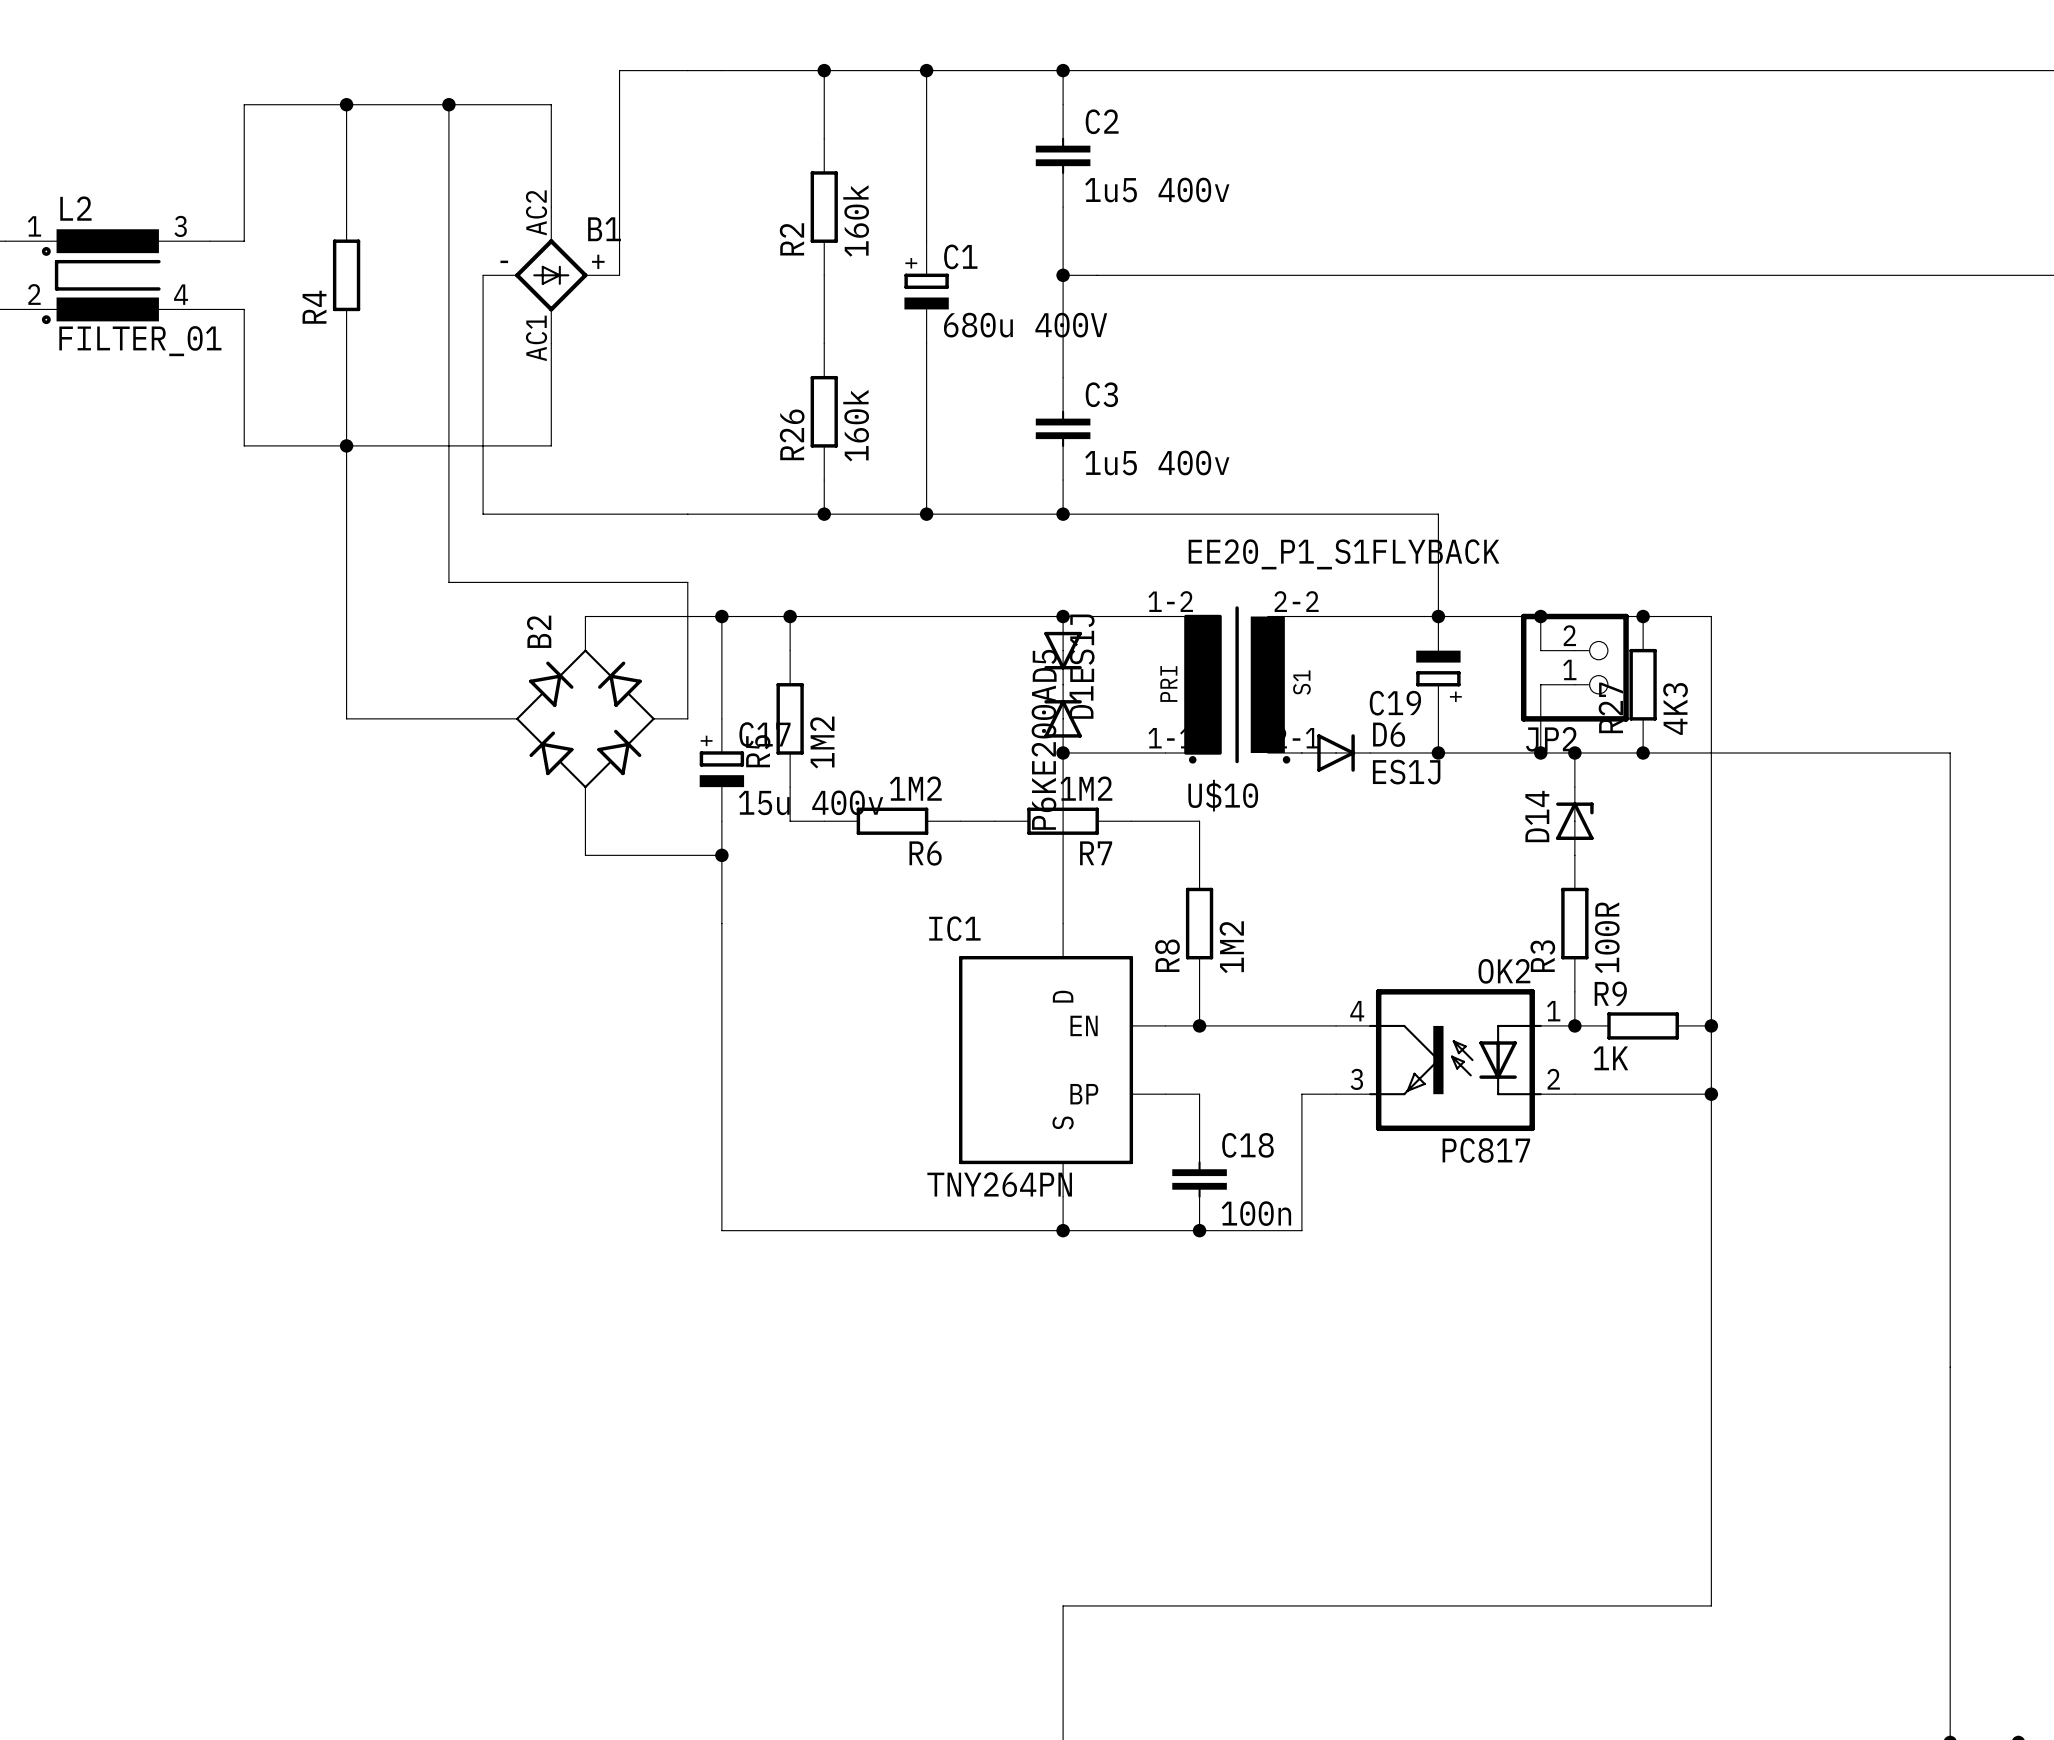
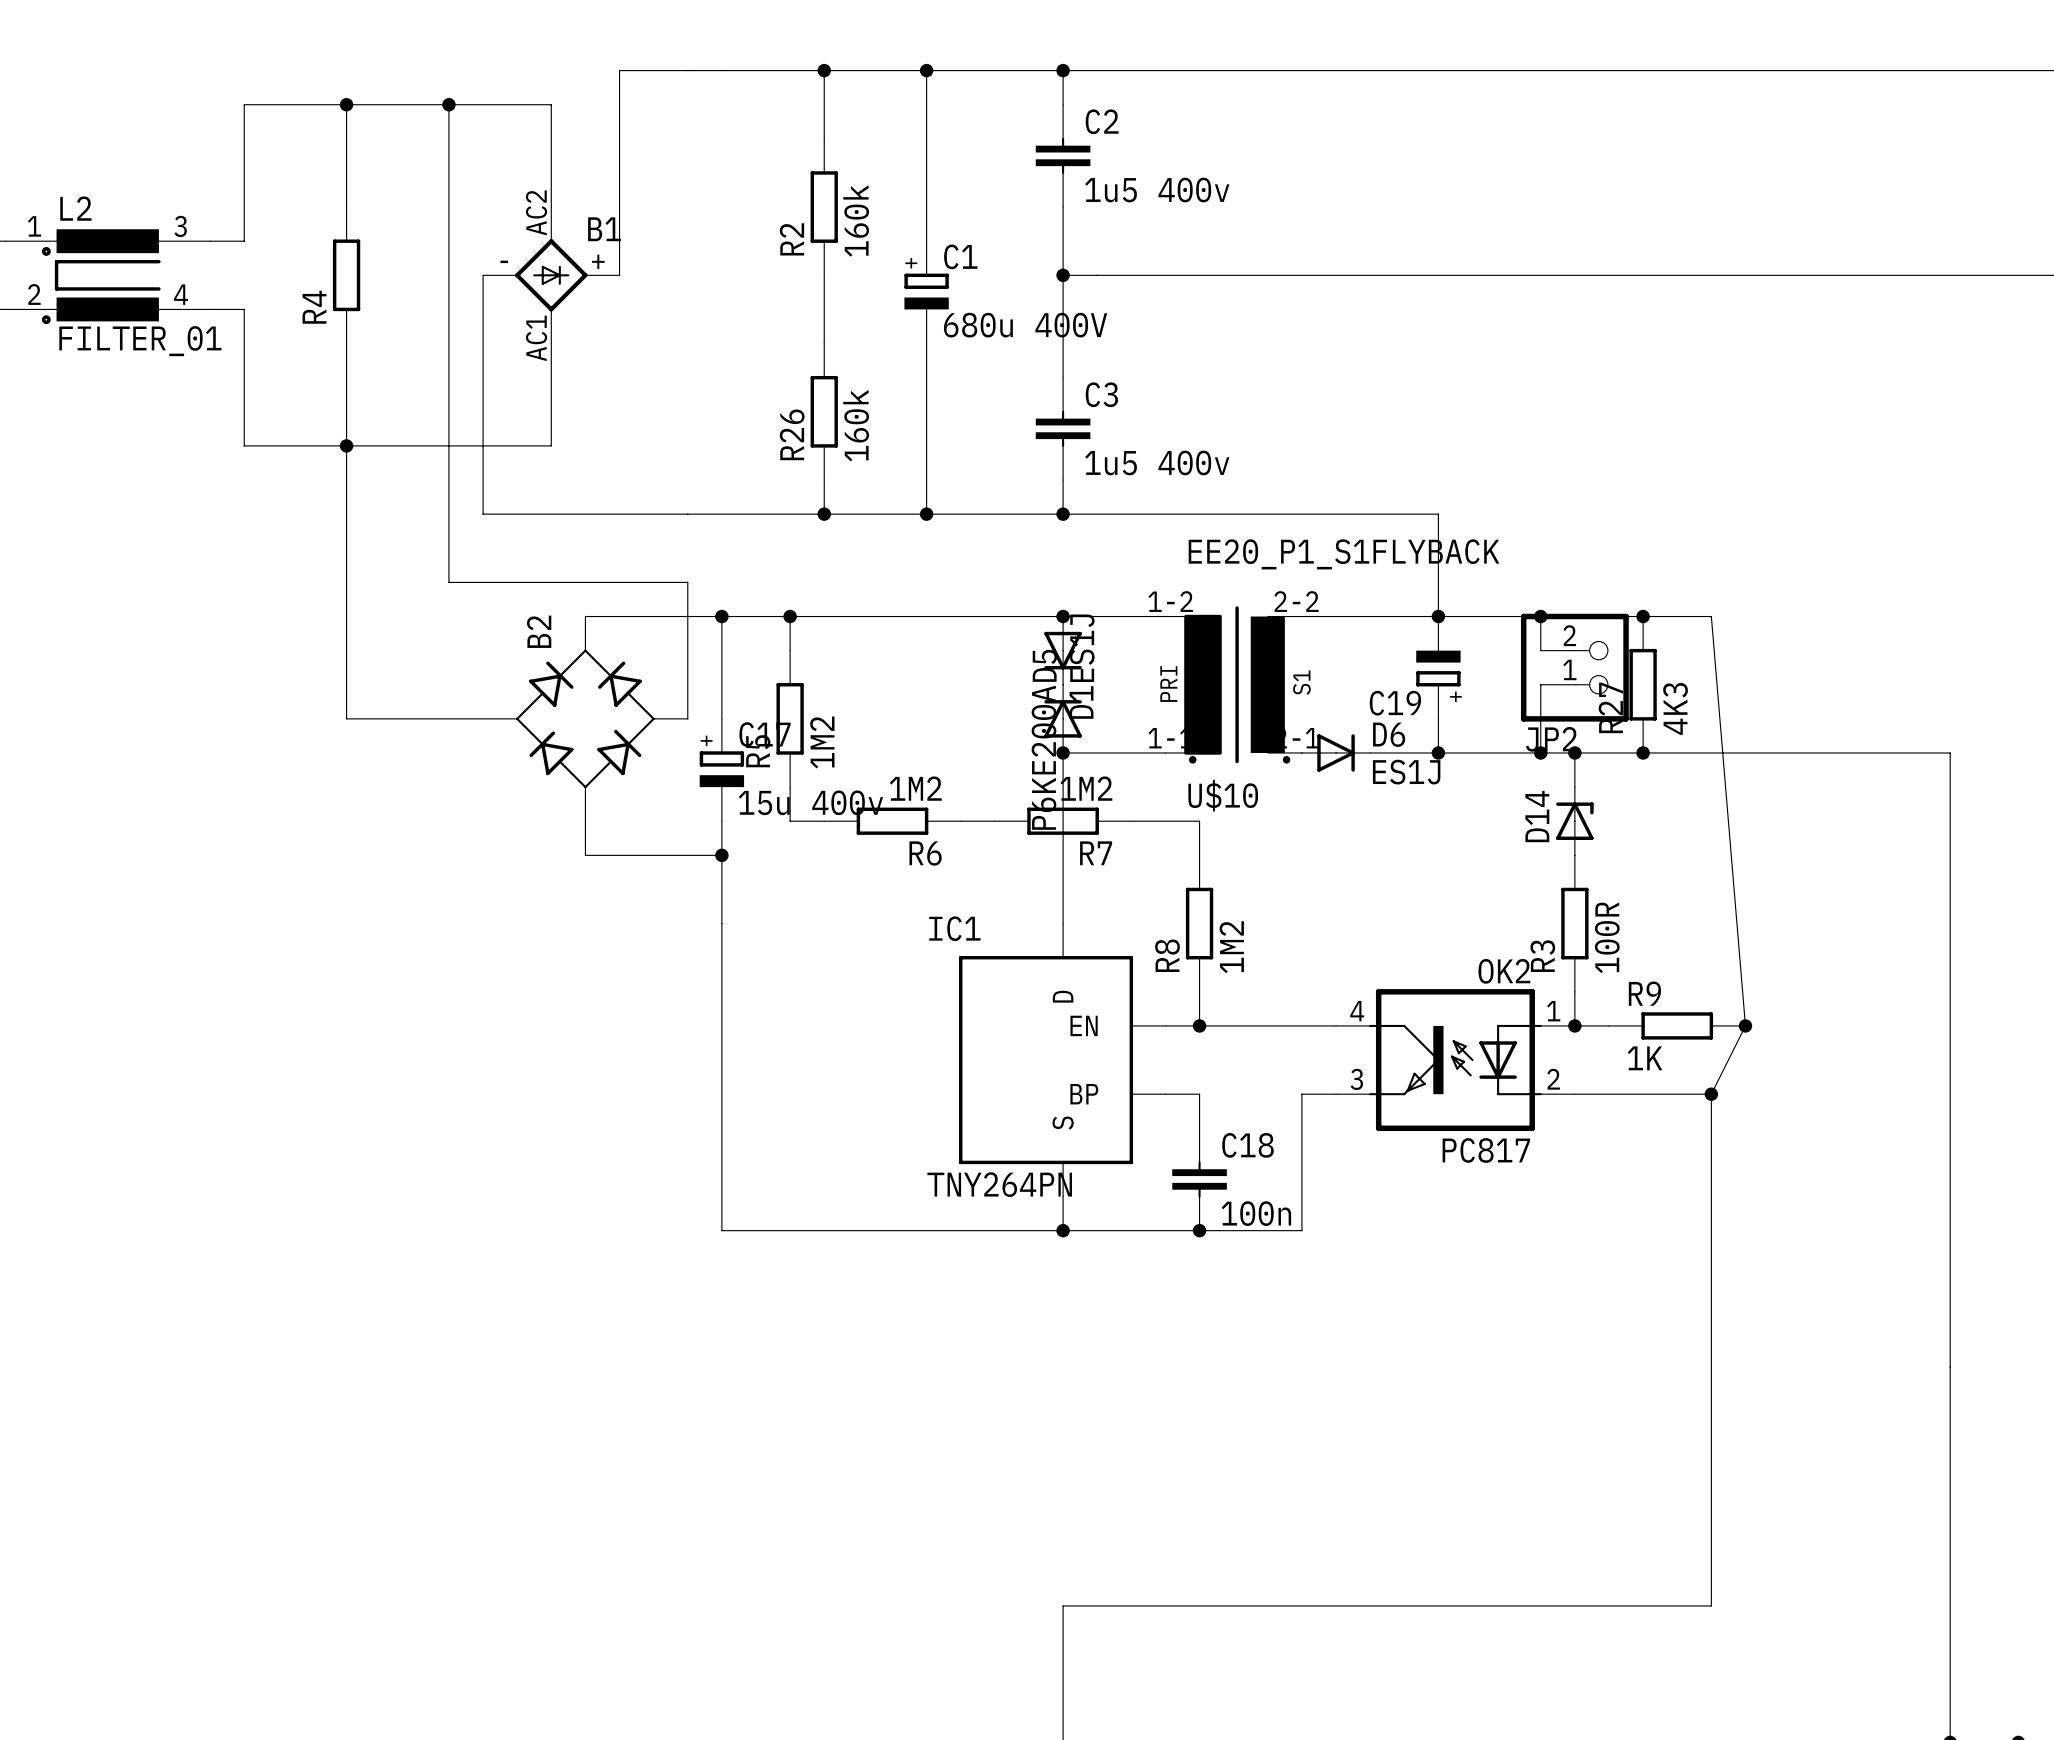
wire: (1711, 616) (1711, 1094) -> (1711, 616) (1745, 1025) (1711, 1094)
R9 position: (1643, 1025) -> (1677, 1025)
junction position: (1711, 1025) -> (1745, 1025)

